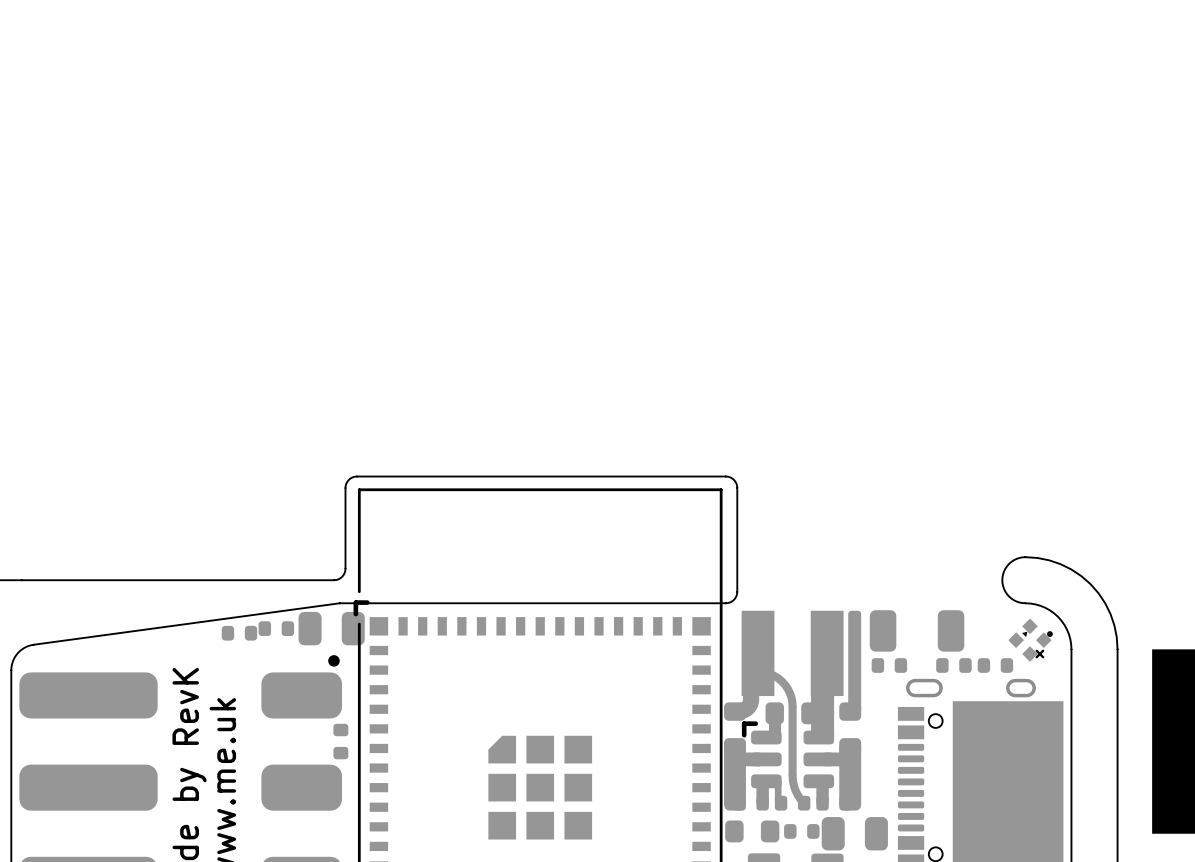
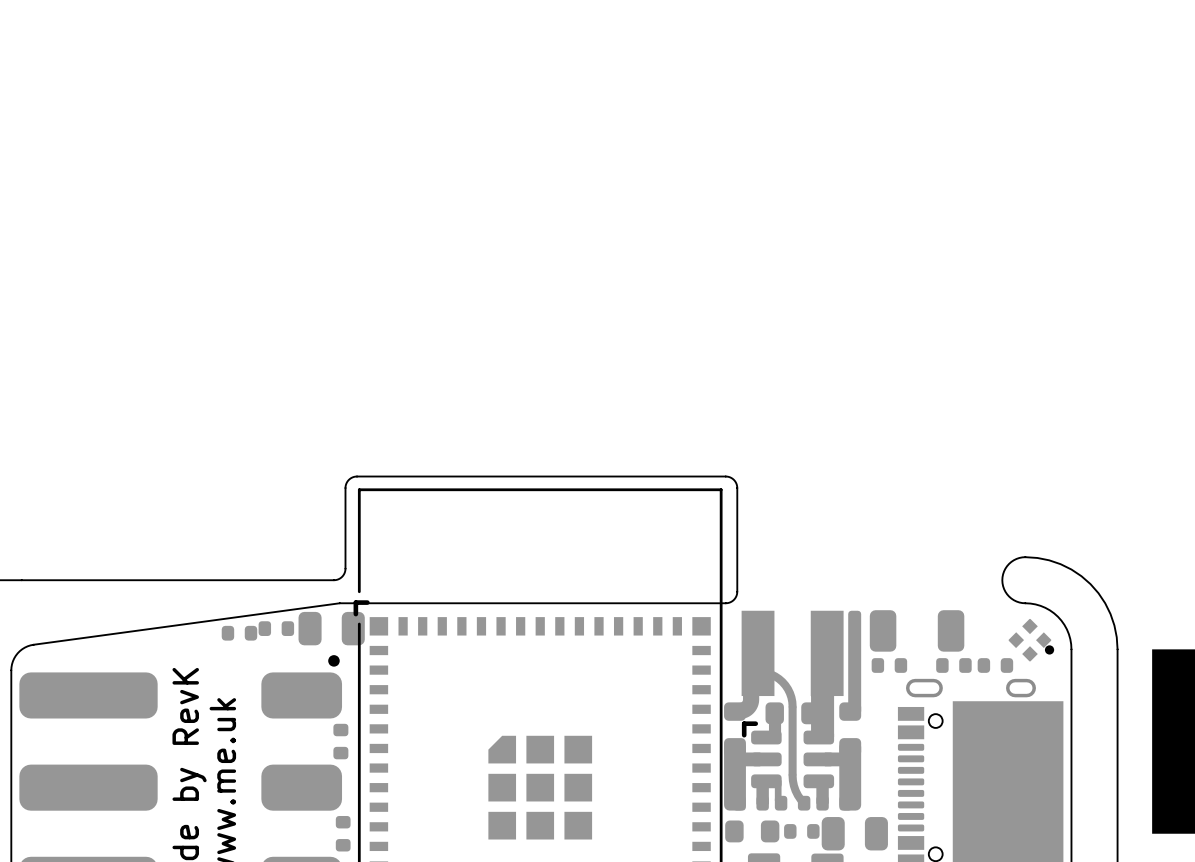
part footprint: [1008, 618, 1053, 662] -> [1008, 618, 1055, 662]
part: none -> (343, 833)

